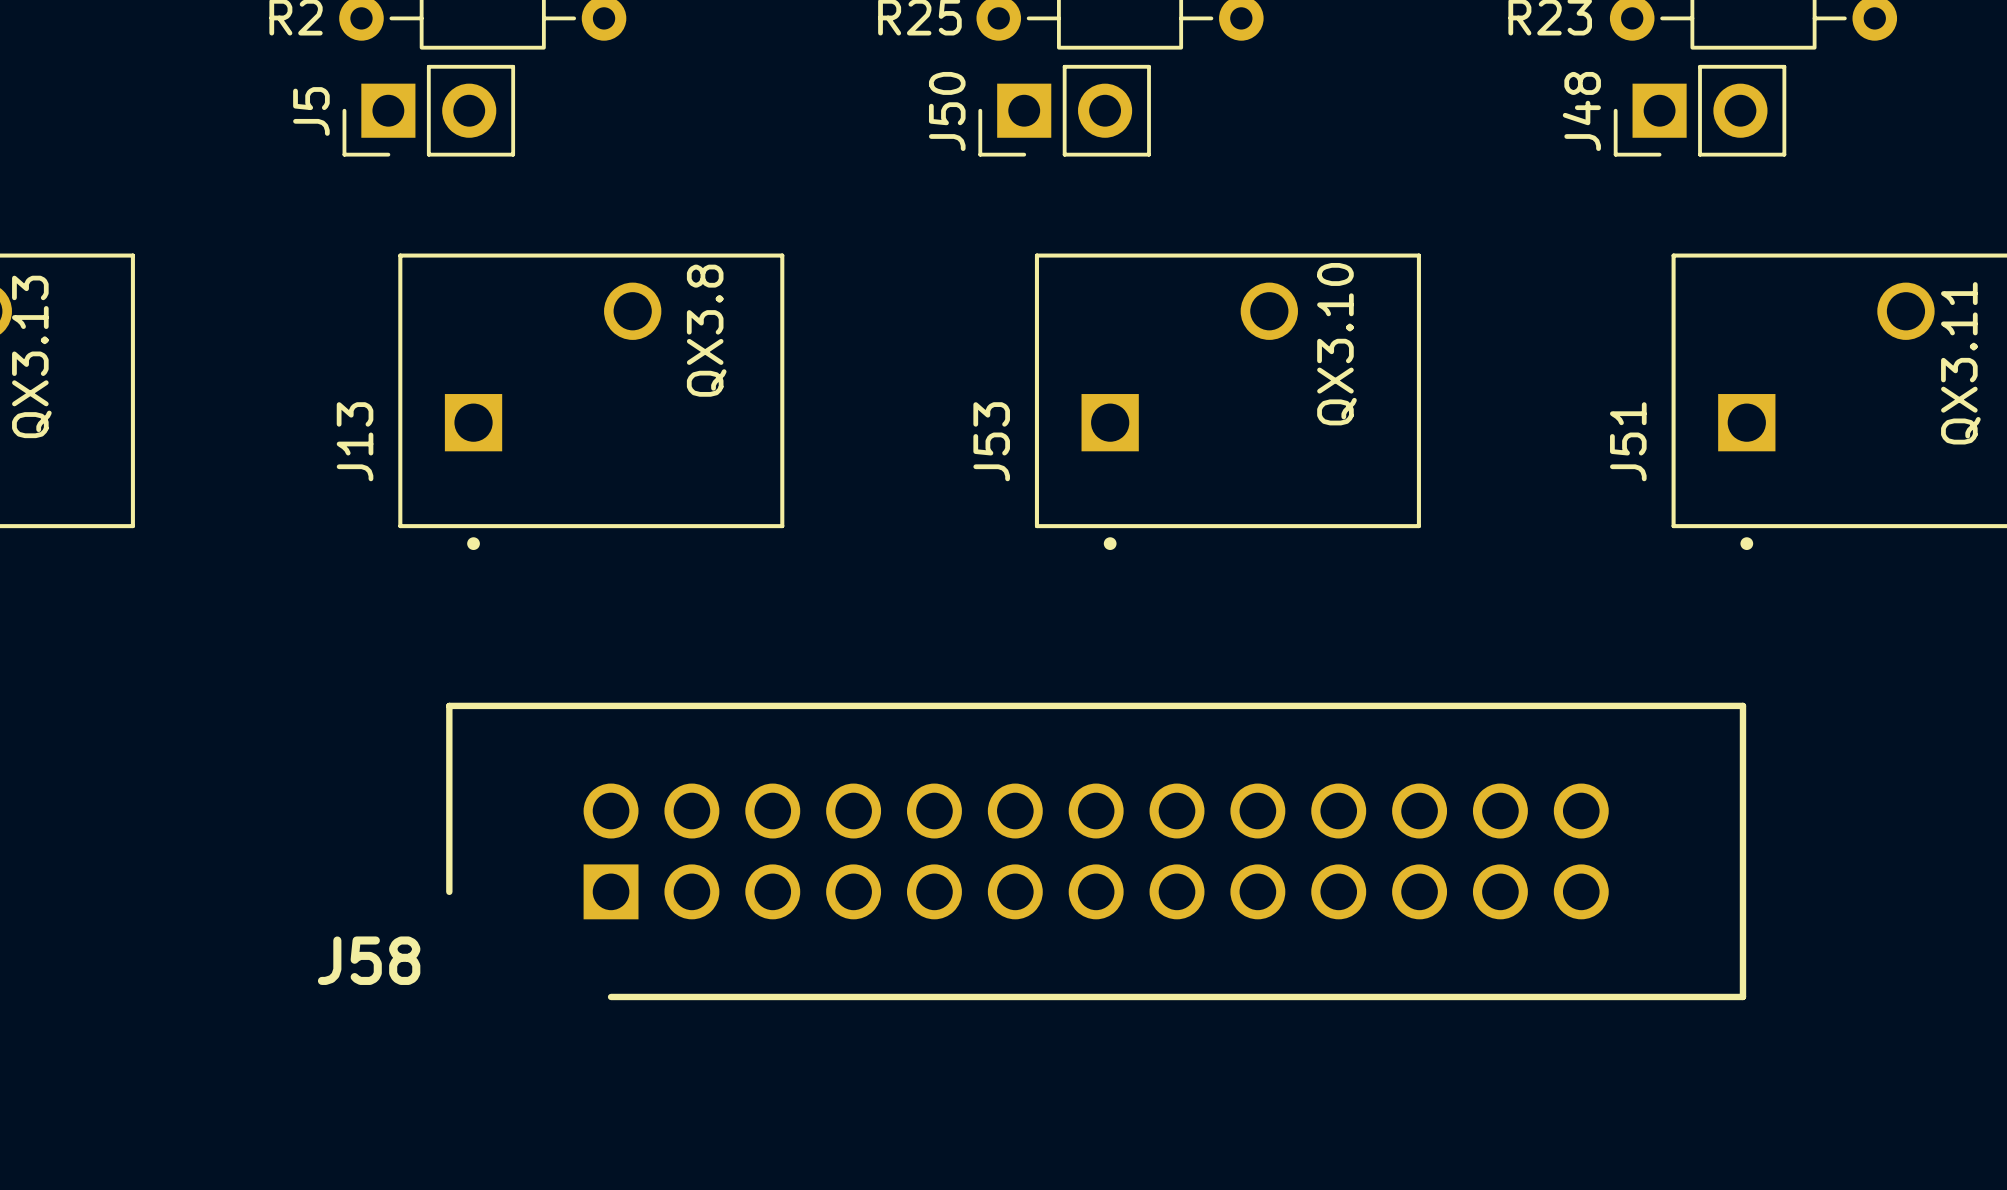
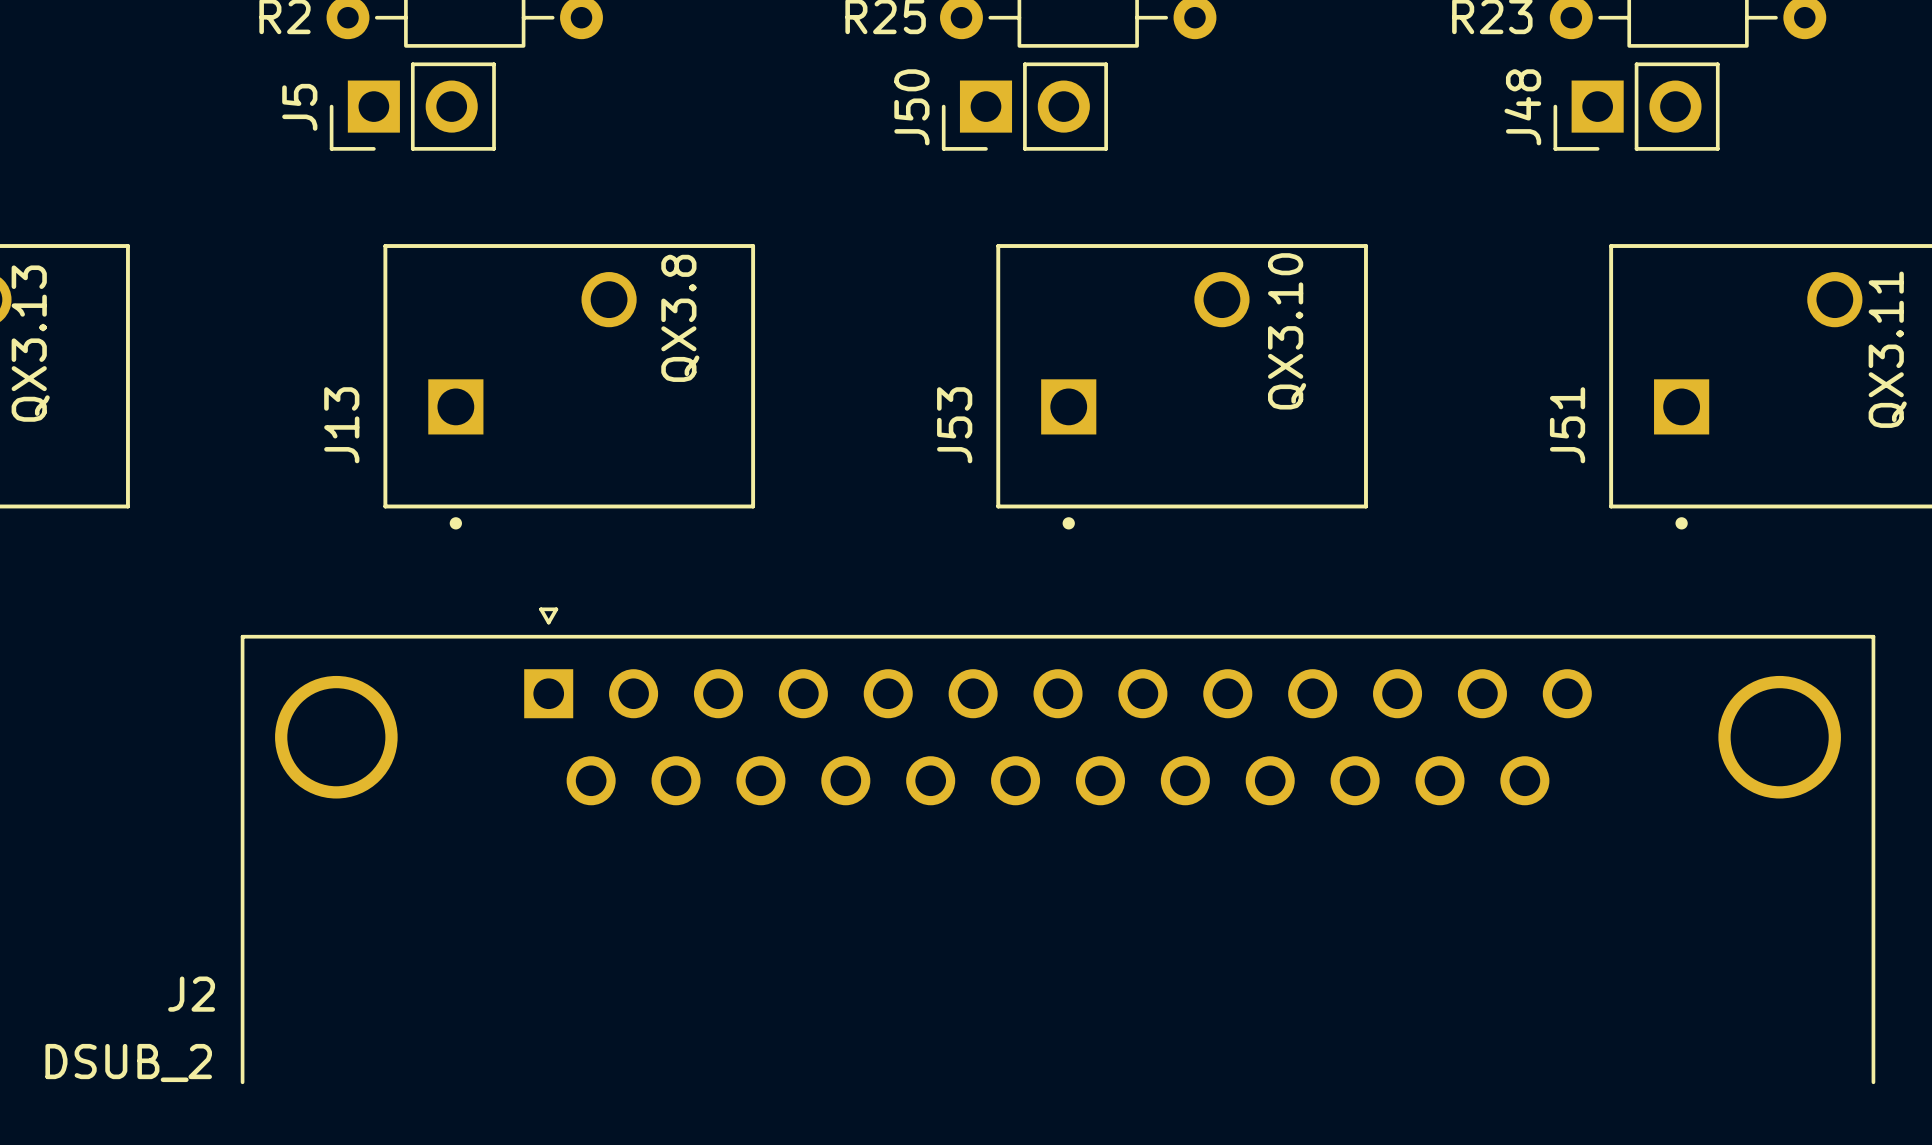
J58: (1096, 851) -> none
J2: none -> DSUB_2 (1058, 845)

